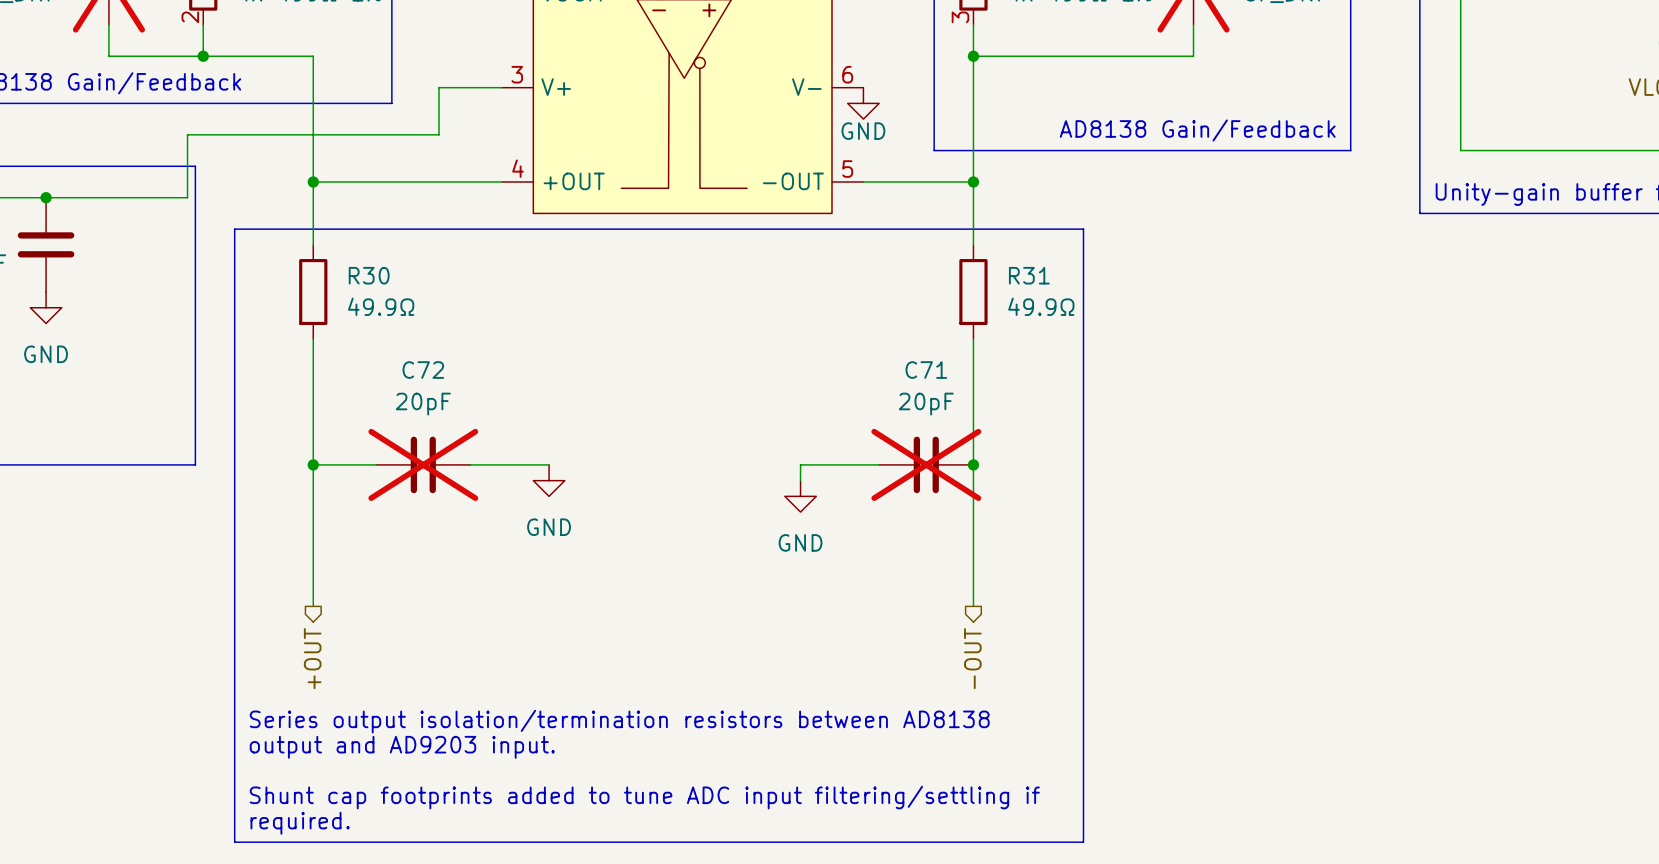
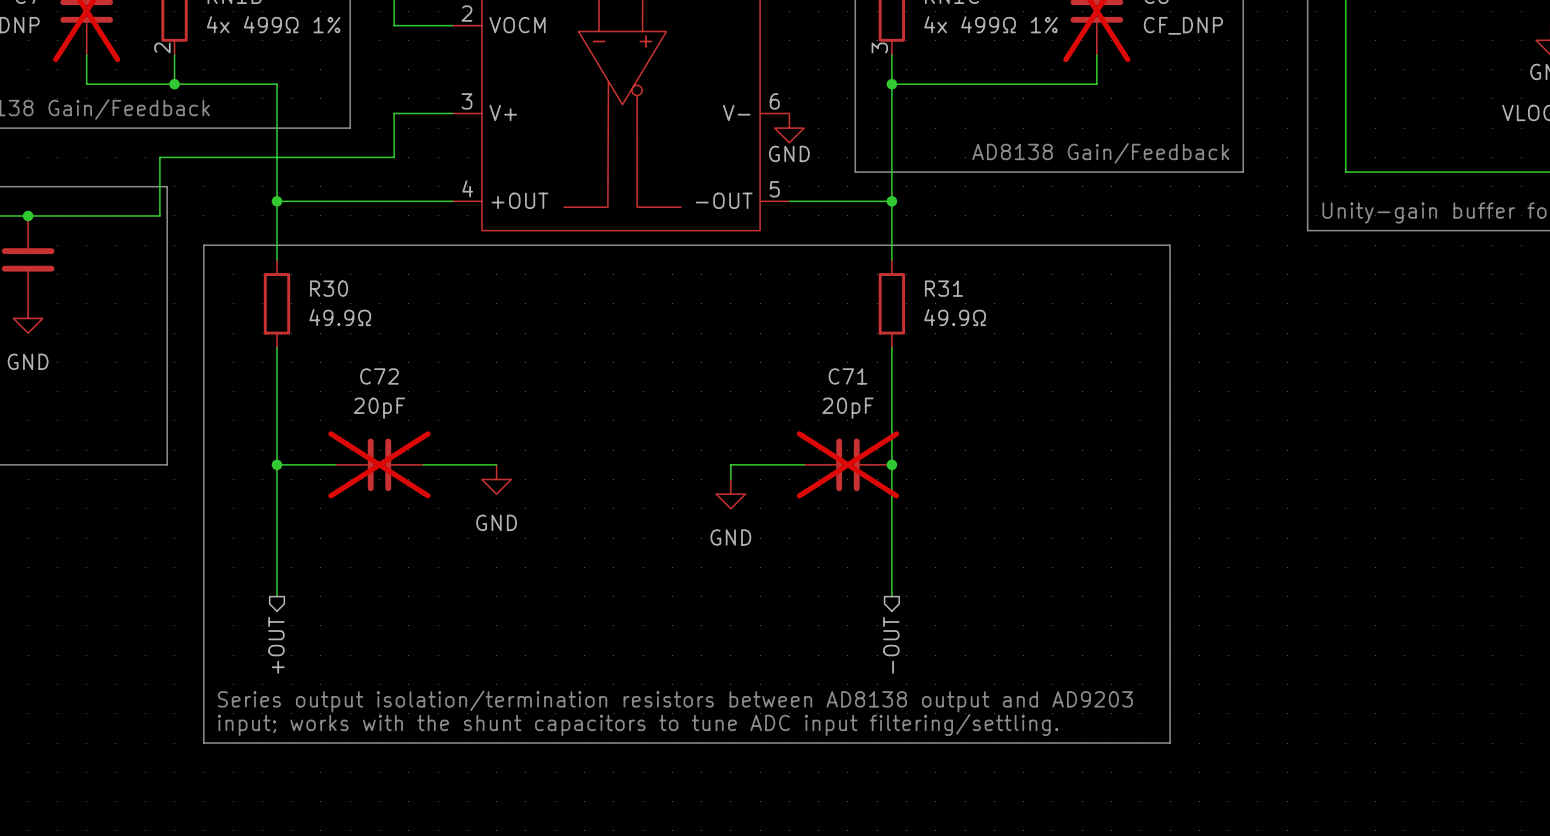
line: (1083, 229) (1083, 842) (234, 842) (234, 763) -> (994, 245) (1170, 245) (1170, 743) (203, 743)
text: Series output isolation/termination resistors between AD8138 (619, 721) -> Series output isolation/termination resistors between AD8138 output and AD9203 (675, 701)
text: output and AD9203 input. (402, 747) -> input; works with the shunt capacitors to tune ADC input filtering/settling. (638, 725)
text: Shunt cap footprints added to tune ADC input filtering/settling if (644, 797) -> none
text: required. (300, 823) -> none

